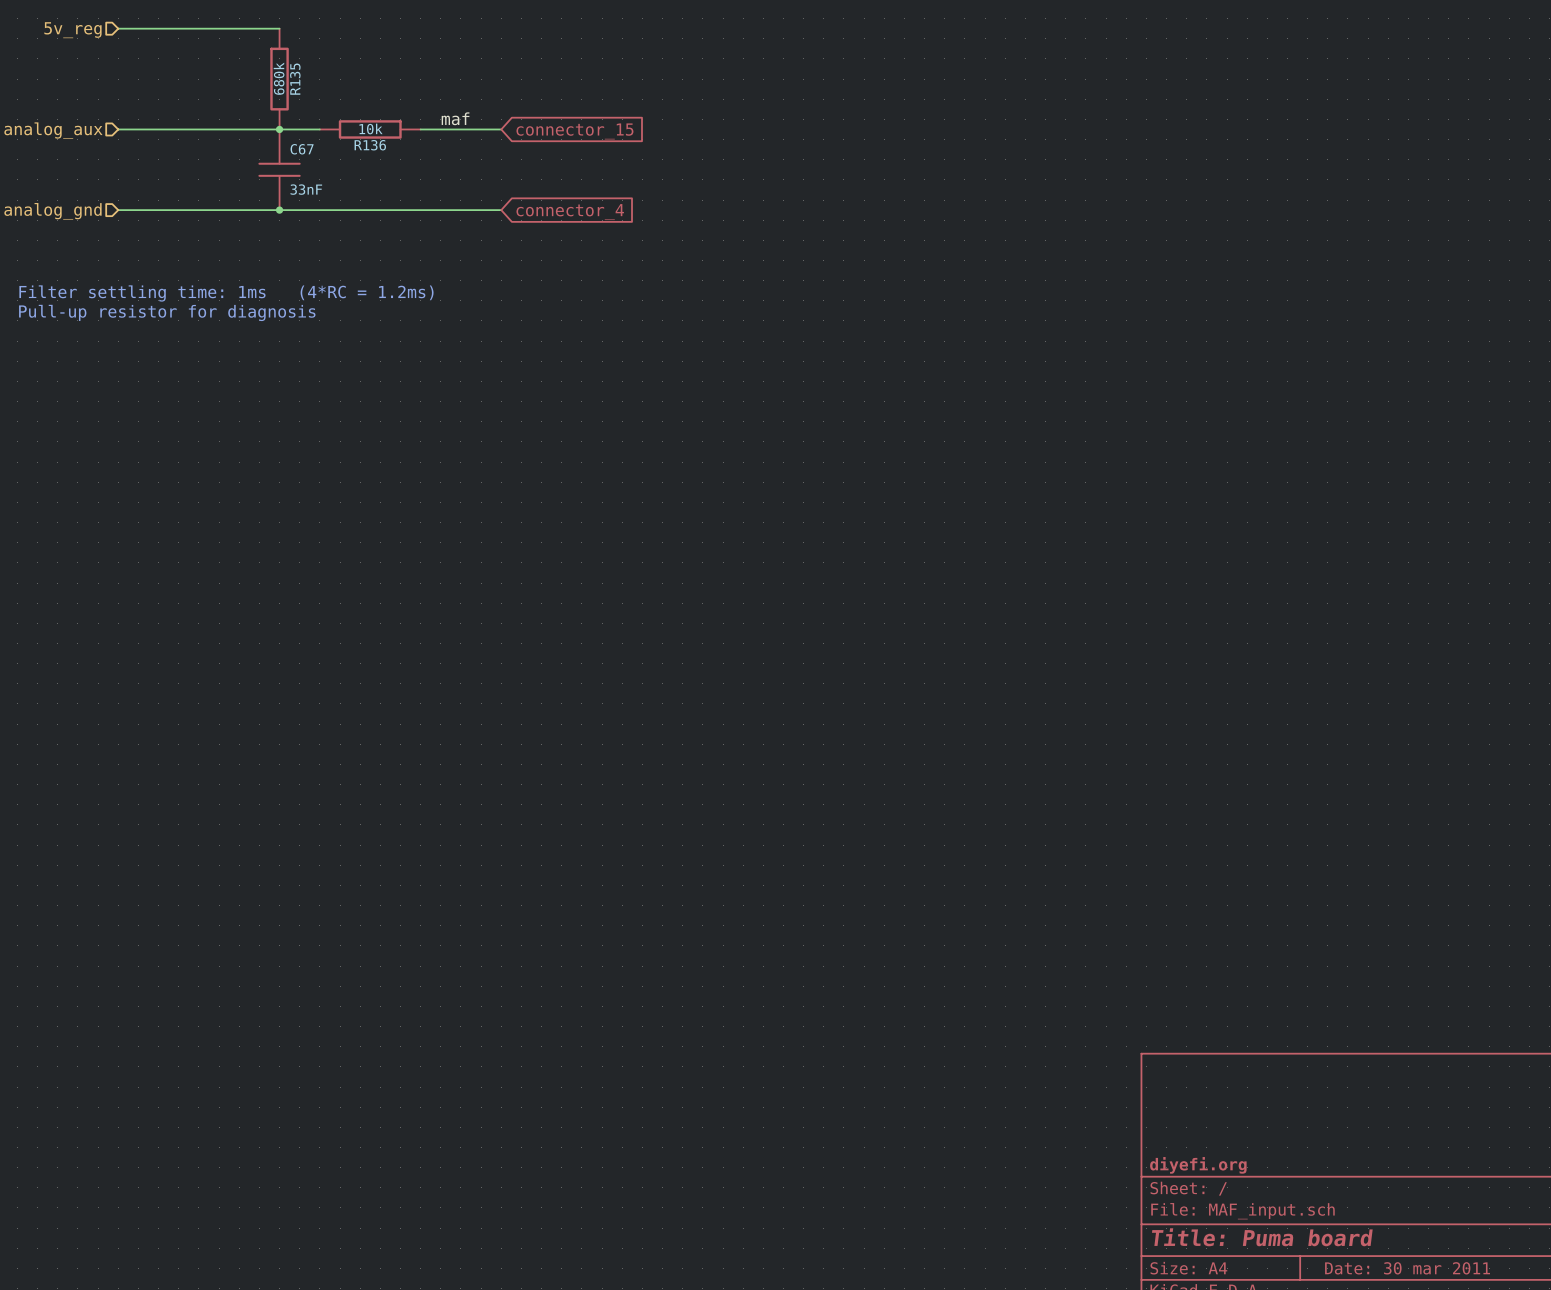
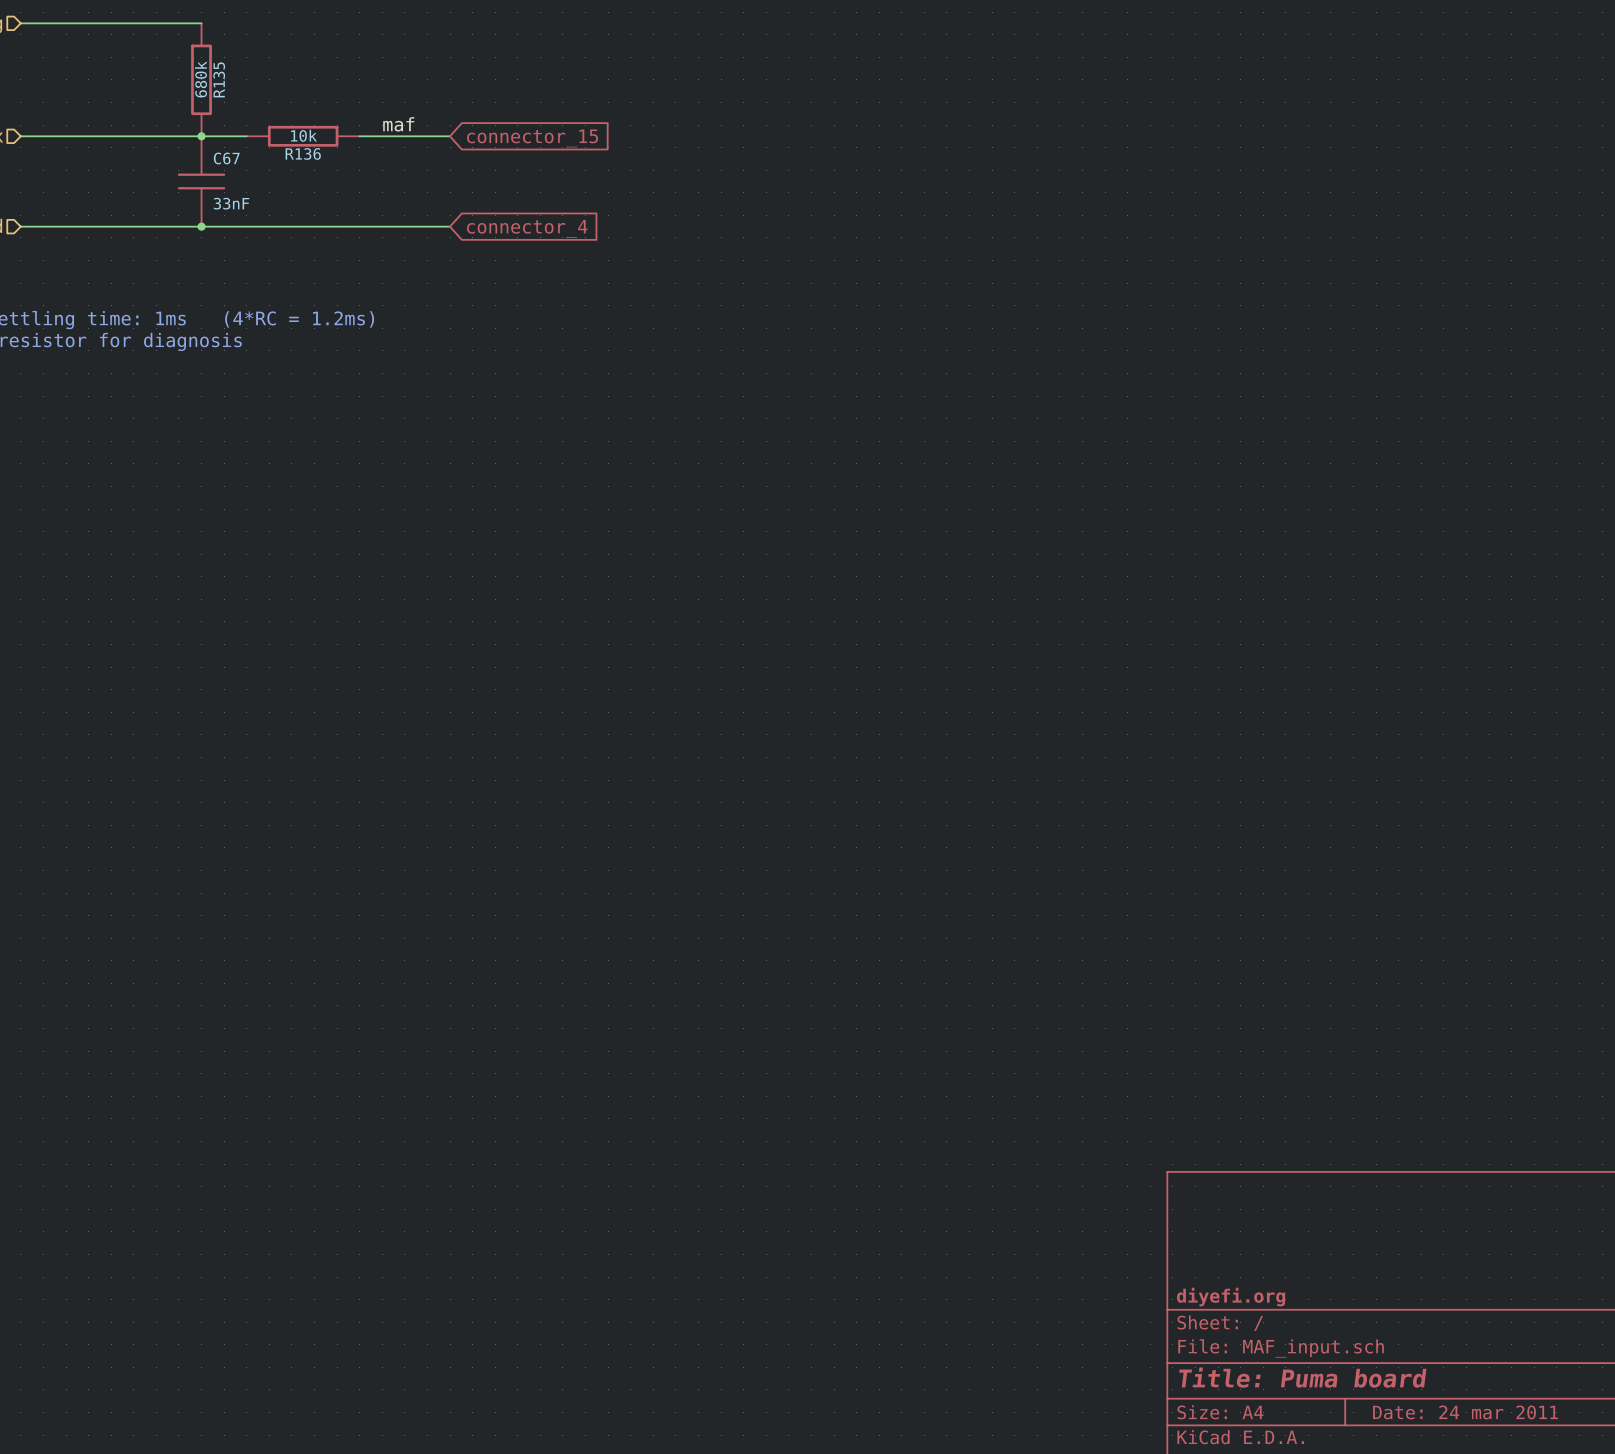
title block: Date: 30 mar 2011 (1407, 1268) -> Date: 24 mar 2011 (1465, 1412)

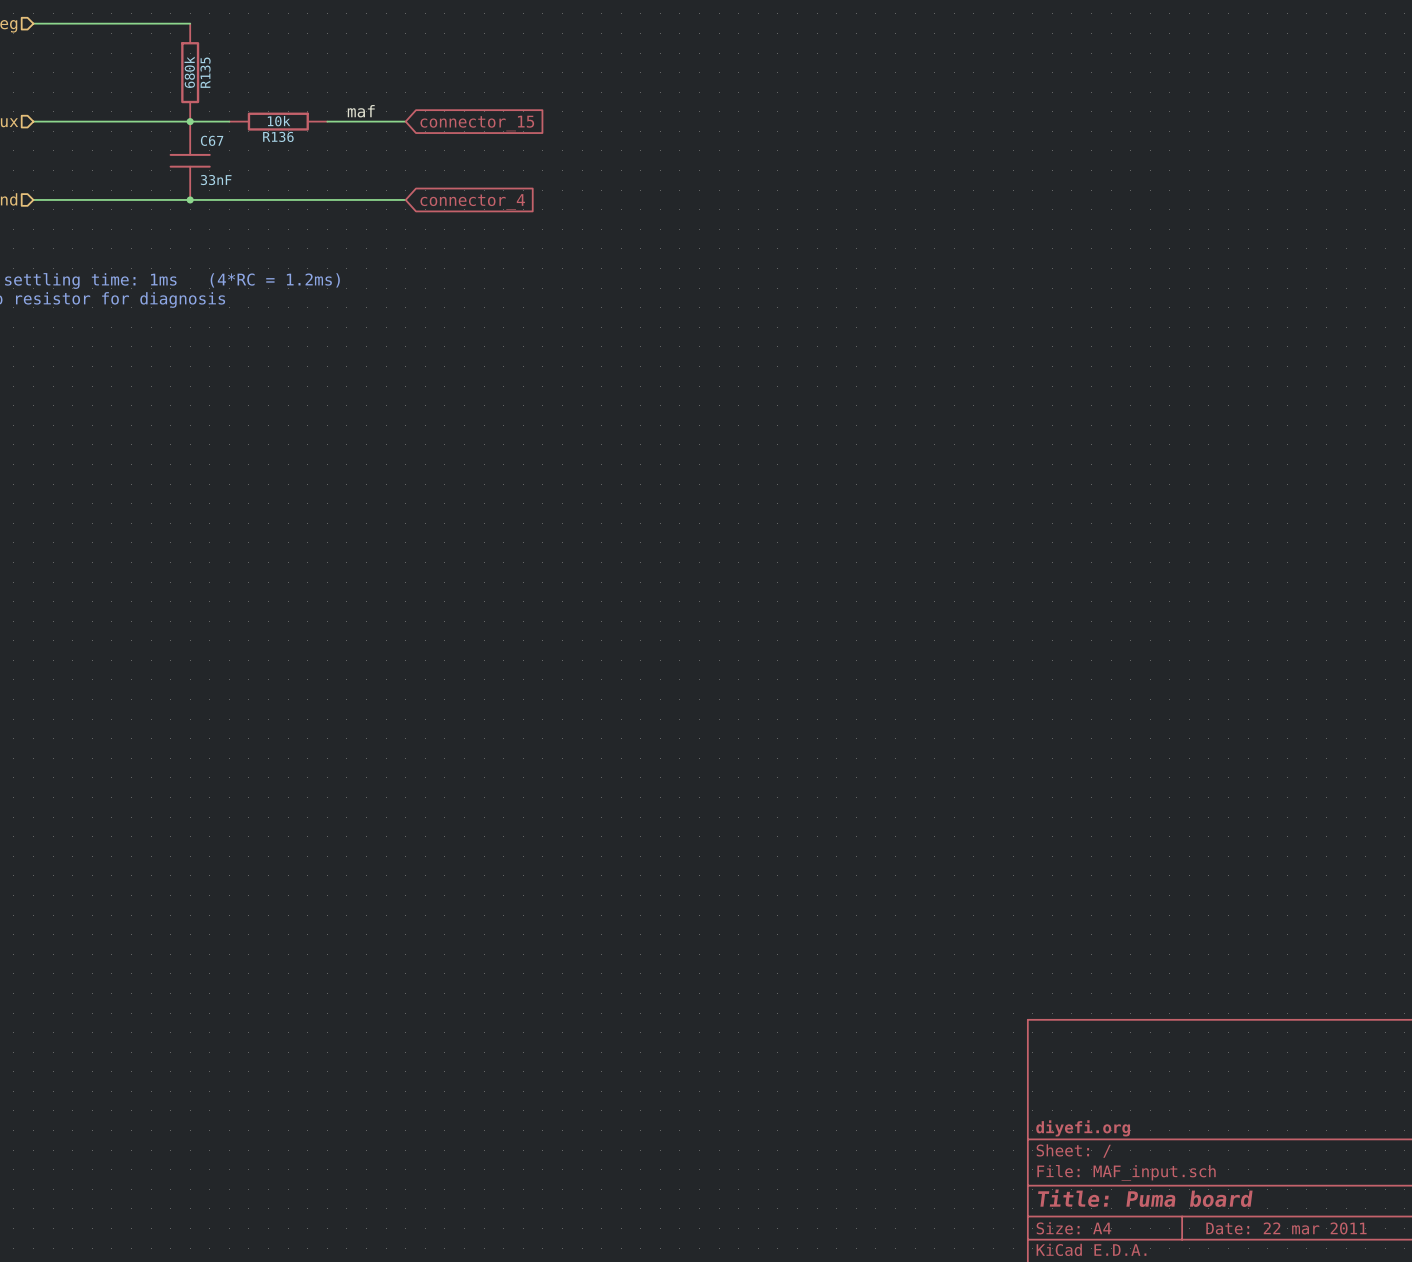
title block: Date: 24 mar 2011 (1465, 1412) -> Date: 22 mar 2011 (1286, 1228)

